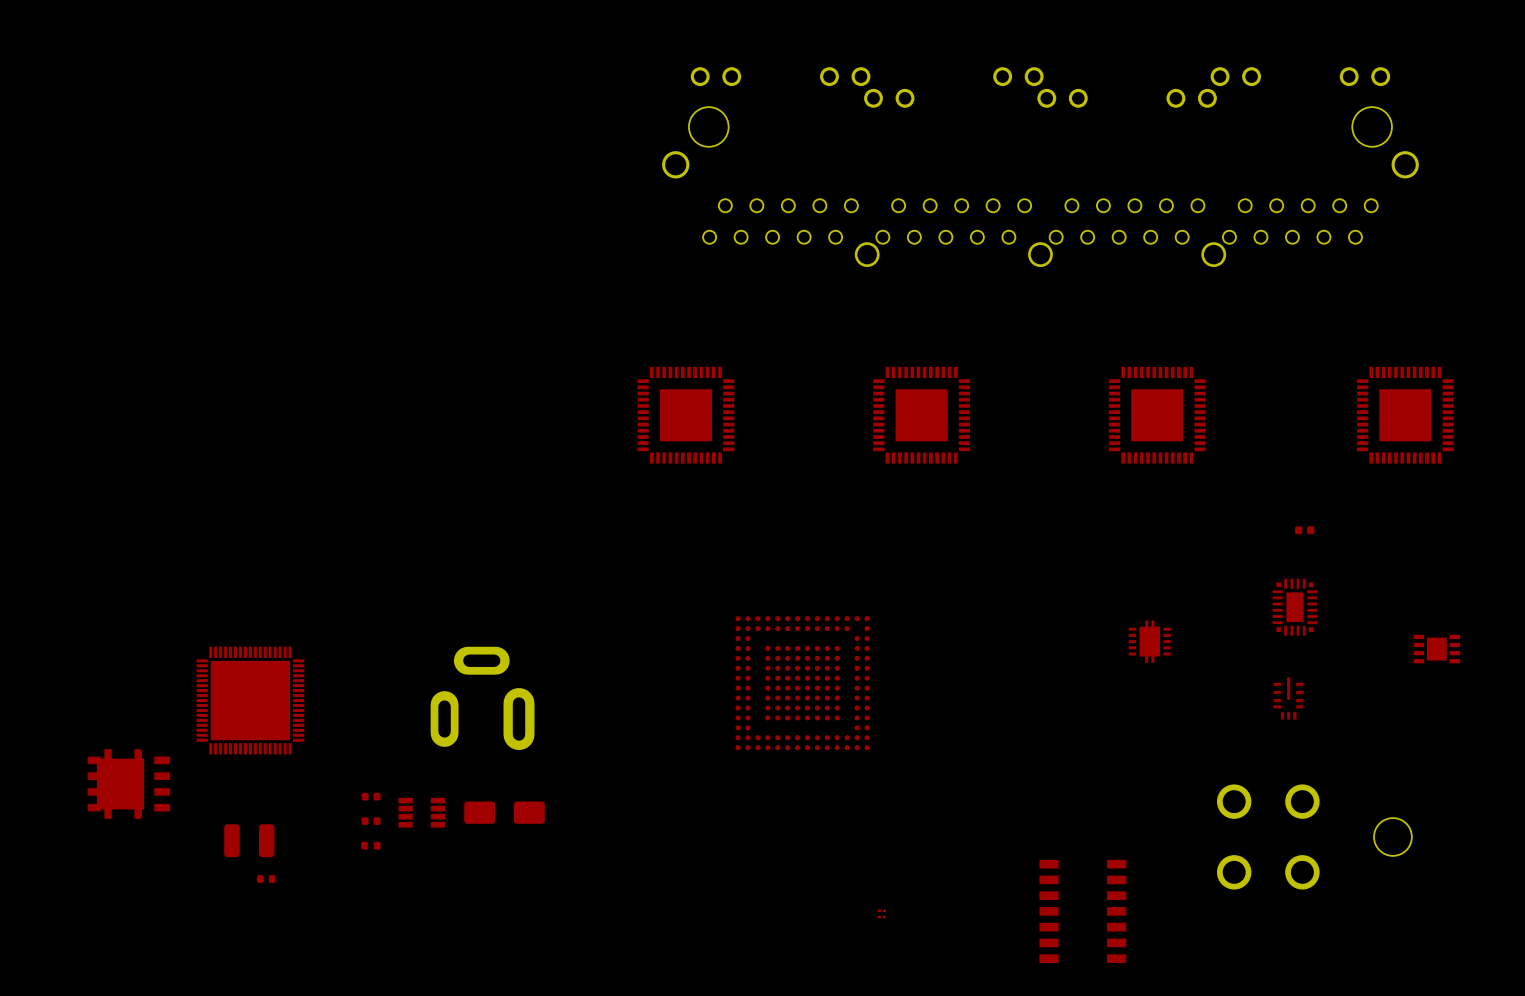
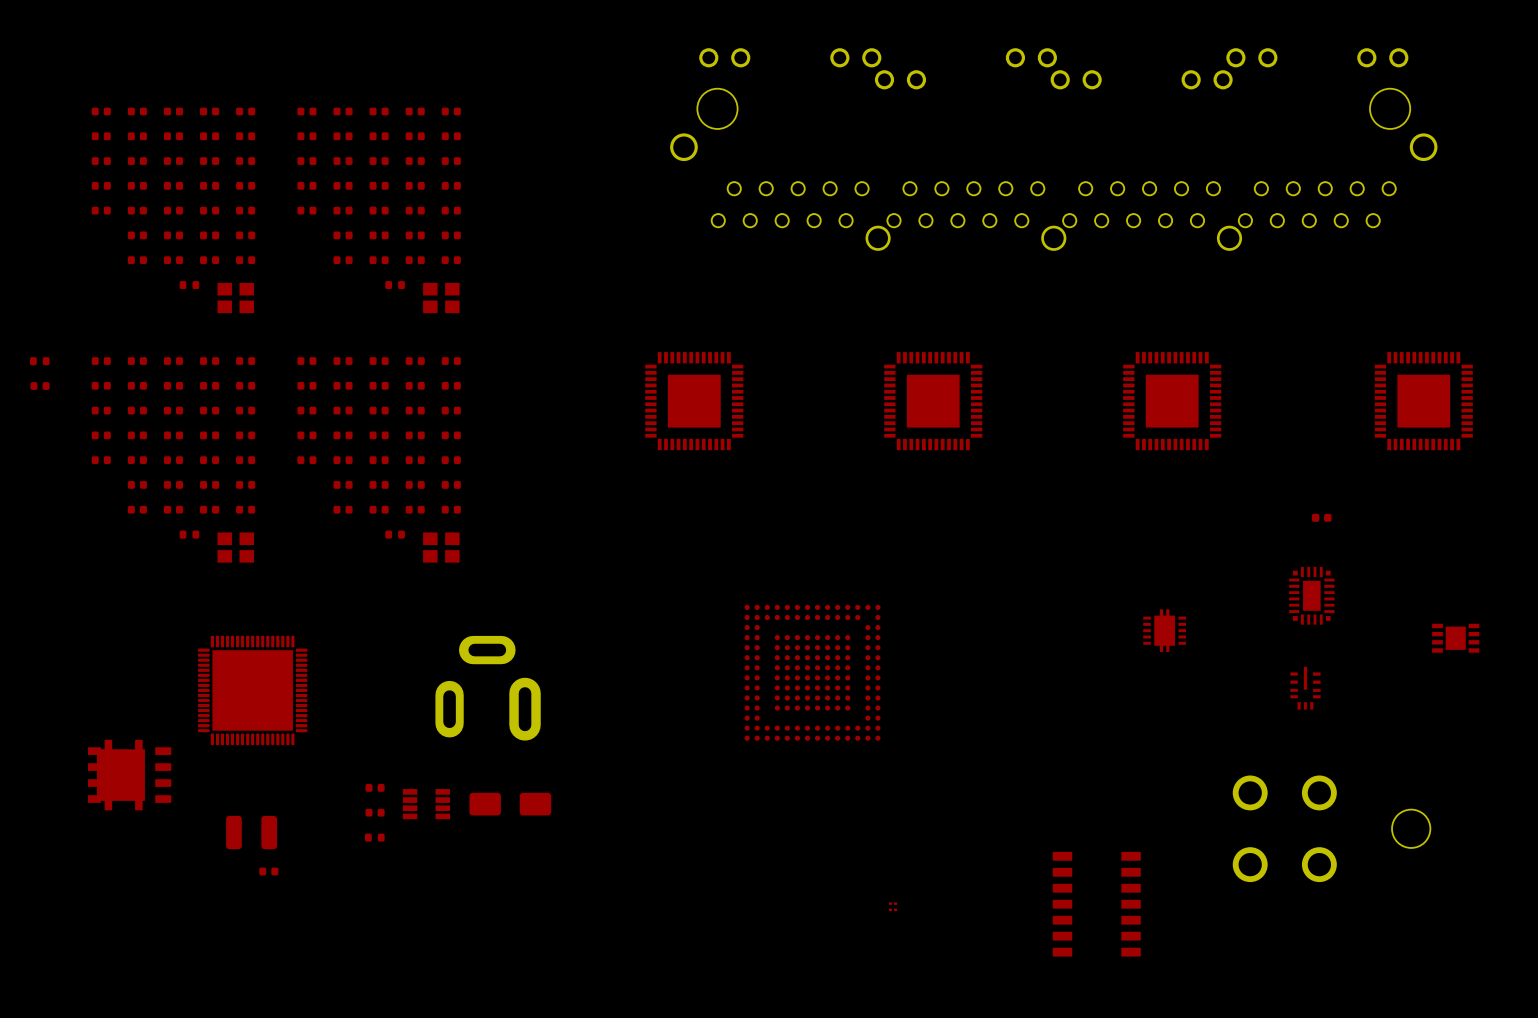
part: none -> (101, 111)
part: none -> (137, 111)
part: none -> (173, 111)
part: none -> (209, 111)
part: none -> (245, 111)
part: none -> (306, 111)
part: none -> (343, 111)
part: none -> (379, 111)
part: none -> (415, 111)
part: none -> (451, 111)
part: none -> (101, 136)
part: none -> (137, 136)
part: none -> (173, 136)
part: none -> (209, 136)
part: none -> (245, 136)
part: none -> (306, 136)
part: none -> (343, 136)
part: none -> (379, 136)
part: none -> (415, 136)
part: none -> (451, 136)
part: none -> (101, 161)
part: none -> (137, 161)
part: none -> (173, 161)
part: none -> (209, 161)
part: none -> (245, 161)
part: none -> (306, 161)
part: none -> (343, 161)
part: none -> (379, 161)
part: none -> (415, 161)
part: none -> (451, 161)
part: none -> (101, 185)
part: none -> (137, 185)
part: none -> (173, 185)
part: none -> (209, 185)
part: none -> (245, 185)
part: none -> (306, 185)
part: none -> (343, 185)
part: none -> (379, 185)
part: none -> (415, 185)
part: none -> (451, 185)
part: none -> (101, 210)
part: none -> (137, 210)
part: none -> (173, 210)
part: none -> (209, 210)
part: none -> (245, 210)
part: none -> (306, 210)
part: none -> (343, 210)
part: none -> (379, 210)
part: none -> (415, 210)
part: none -> (451, 210)
part: none -> (137, 235)
part: none -> (173, 235)
part: none -> (209, 235)
part: none -> (245, 235)
part: none -> (343, 235)
part: none -> (379, 235)
part: none -> (415, 235)
part: none -> (451, 235)
part: none -> (137, 260)
part: none -> (173, 260)
part: none -> (209, 260)
part: none -> (245, 260)
part: none -> (343, 260)
part: none -> (379, 260)
part: none -> (415, 260)
part: none -> (451, 260)
part: none -> (189, 285)
part: none -> (395, 285)
part: none -> (235, 298)
part: none -> (441, 298)
part: none -> (39, 361)
part: none -> (101, 361)
part: none -> (137, 361)
part: none -> (173, 361)
part: none -> (209, 361)
part: none -> (245, 361)
part: none -> (306, 361)
part: none -> (343, 361)
part: none -> (379, 361)
part: none -> (415, 361)
part: none -> (451, 361)
part: none -> (40, 386)
part: none -> (101, 385)
part: none -> (137, 385)
part: none -> (173, 385)
part: none -> (209, 385)
part: none -> (245, 385)
part: none -> (306, 385)
part: none -> (343, 385)
part: none -> (379, 385)
part: none -> (415, 385)
part: none -> (451, 385)
part: none -> (101, 410)
part: none -> (137, 410)
part: none -> (173, 410)
part: none -> (209, 410)
part: none -> (245, 410)
part: none -> (306, 410)
part: none -> (343, 410)
part: none -> (379, 410)
part: none -> (415, 410)
part: none -> (451, 410)
part: none -> (101, 435)
part: none -> (137, 435)
part: none -> (173, 435)
part: none -> (209, 435)
part: none -> (245, 435)
part: none -> (306, 435)
part: none -> (343, 435)
part: none -> (379, 435)
part: none -> (415, 435)
part: none -> (451, 435)
part: none -> (101, 460)
part: none -> (137, 460)
part: none -> (173, 460)
part: none -> (209, 460)
part: none -> (245, 460)
part: none -> (306, 460)
part: none -> (343, 460)
part: none -> (379, 460)
part: none -> (415, 460)
part: none -> (451, 460)
part: none -> (137, 484)
part: none -> (173, 484)
part: none -> (209, 484)
part: none -> (245, 484)
part: none -> (343, 484)
part: none -> (379, 484)
part: none -> (415, 484)
part: none -> (451, 484)
part: none -> (137, 509)
part: none -> (173, 509)
part: none -> (209, 509)
part: none -> (245, 509)
part: none -> (343, 509)
part: none -> (379, 509)
part: none -> (415, 509)
part: none -> (451, 509)
part: none -> (189, 534)
part: none -> (395, 534)
part: none -> (235, 547)
part: none -> (441, 547)

